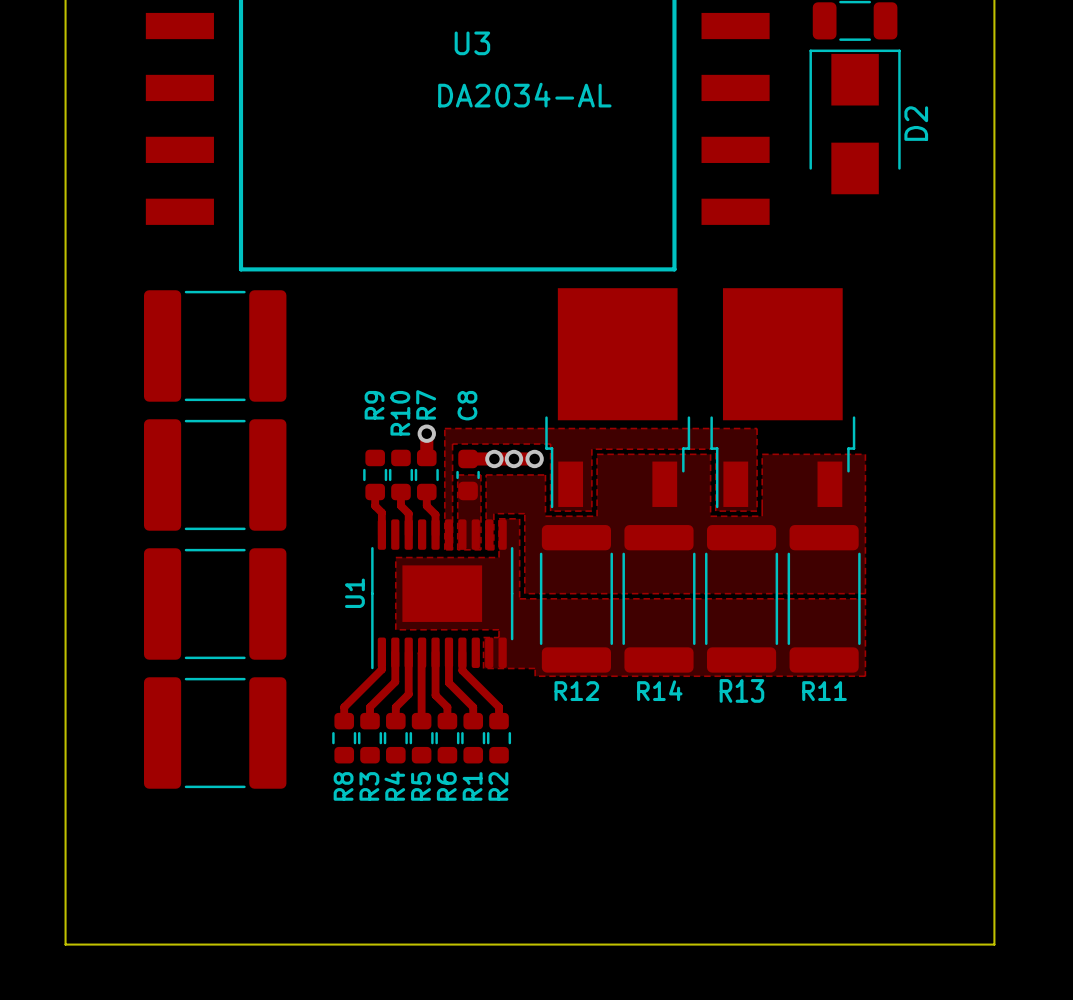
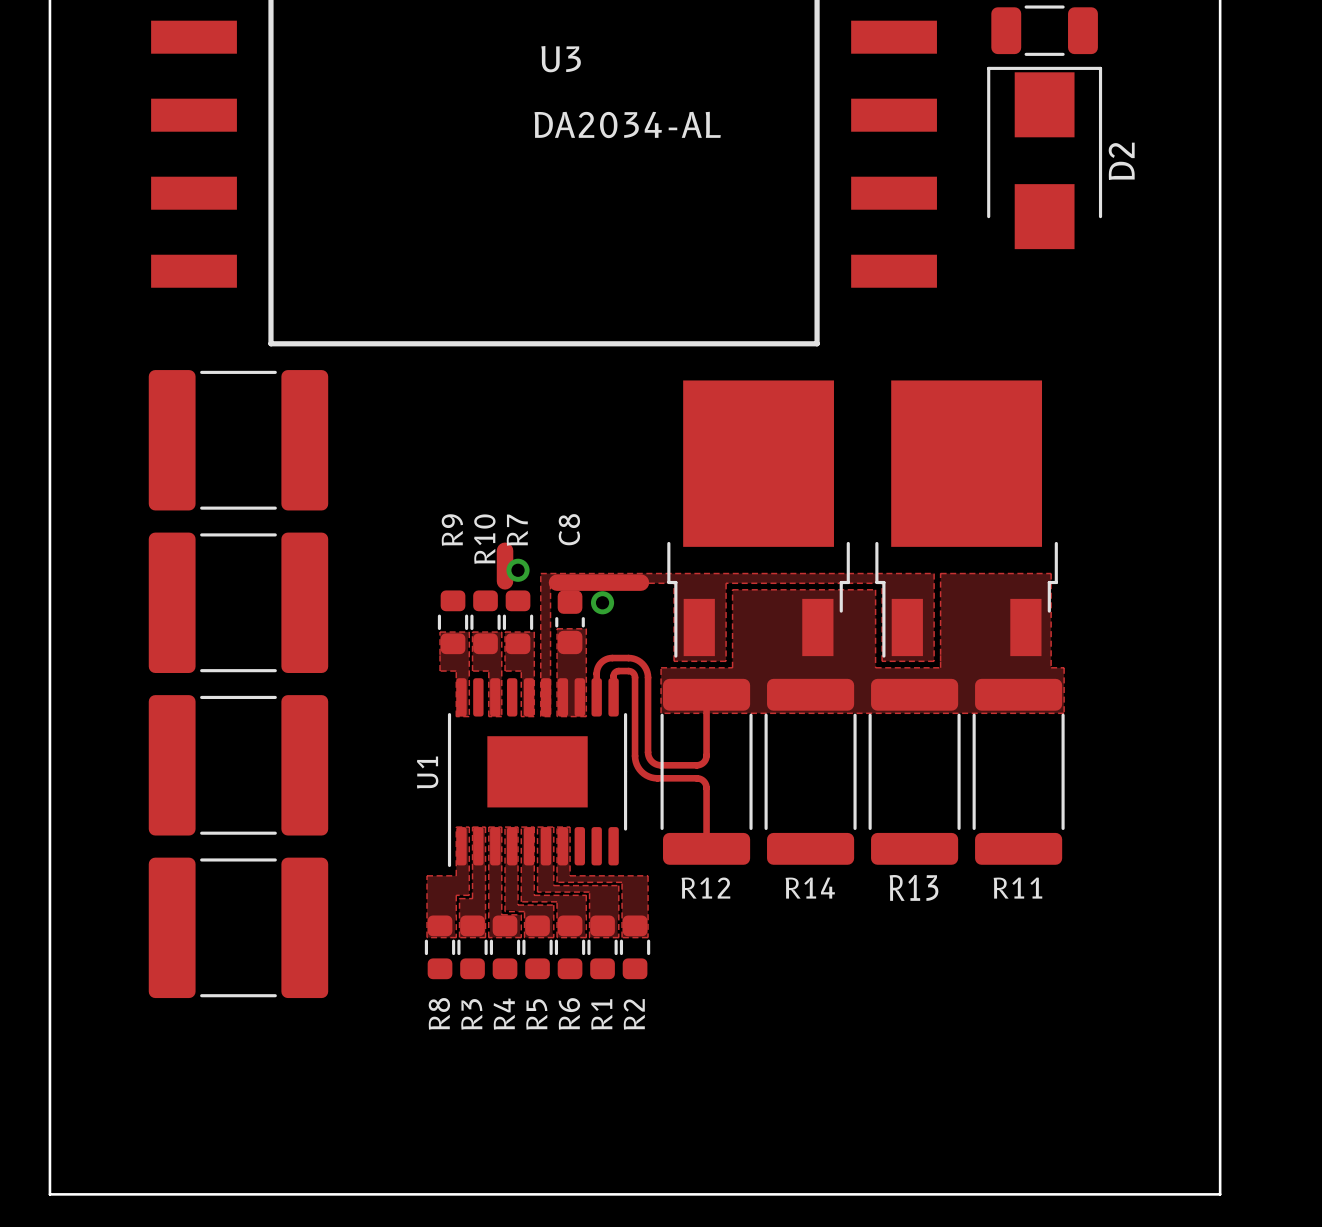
part position: (617, 398) -> (758, 519)
part position: (782, 398) -> (966, 519)
zone outline: (444, 428) (444, 549) (452, 549) (452, 444) (550, 444) (550, 511) (591, 511) (591, 449) (715, 449) (715, 511) (757, 511) (757, 428) (444, 428) -> (540, 573) (540, 716) (550, 716) (550, 583) (674, 583) (674, 661) (726, 661) (726, 583) (882, 583) (882, 661) (934, 661) (934, 573) (540, 573)
via position: (426, 433) -> (518, 570)
zone outline: (597, 454) (710, 454) (710, 516) (762, 516) (762, 454) (865, 454) (865, 593) (524, 593) (524, 513) (493, 513) (493, 549) (486, 549) (486, 474) (545, 474) (545, 516) (597, 516) (597, 454) -> (940, 573) (940, 667) (875, 667) (875, 589) (732, 589) (732, 667) (661, 667) (661, 713) (1064, 713) (1064, 667) (1051, 667) (1051, 573) (940, 573)
via: (494, 458) -> none
via: (513, 458) -> none
via: (534, 458) -> none
R9 position: (375, 474) -> (453, 622)
R10 position: (400, 474) -> (485, 622)
R7 position: (426, 474) -> (518, 622)
zone outline: (457, 474) (457, 549) (480, 549) (480, 474) (457, 474) -> none
C8 position: (468, 474) -> (570, 622)
via: none -> (602, 602)
track: (375, 492) (375, 505) (381, 512) (381, 534) -> none
track: (400, 492) (400, 505) (408, 513) (408, 534) -> none
track: (426, 492) (426, 505) (435, 514) (435, 534) -> none
zone outline: none -> (557, 628) (557, 716) (586, 716) (586, 628) (557, 628)
zone outline: none -> (440, 632) (469, 632) (469, 716) (456, 716) (456, 671) (440, 671) (440, 632)
zone outline: none -> (472, 632) (472, 671) (488, 671) (488, 716) (501, 716) (501, 632) (472, 632)
zone outline: none -> (505, 632) (505, 671) (521, 671) (521, 716) (534, 716) (534, 632) (505, 632)
zone outline: (499, 518) (499, 557) (395, 557) (395, 629) (499, 629) (499, 637) (483, 637) (483, 668) (535, 668) (535, 676) (865, 676) (865, 598) (519, 598) (519, 518) (499, 518) -> none
track: none -> (706, 694) (706, 756) (702, 763) (696, 765) (659, 765) (649, 758) (648, 752) (647, 675) (640, 662) (628, 658) (610, 658) (602, 661) (596, 671) (596, 697)
track: none -> (613, 697) (614, 673) (618, 671) (632, 672) (635, 677) (635, 758) (641, 771) (654, 778) (698, 778) (705, 783) (706, 848)
U1 position: (442, 594) -> (537, 772)
R12 position: (576, 598) -> (706, 771)
R14 position: (658, 598) -> (810, 771)
R13 position: (741, 598) -> (914, 771)
R11 position: (824, 598) -> (1018, 771)
track: (381, 652) (381, 669) (344, 707) (344, 721) -> none
track: (395, 652) (395, 681) (370, 707) (370, 721) -> none
track: (408, 652) (408, 694) (395, 707) (395, 721) -> none
track: (422, 652) (421, 721) -> none
track: (435, 652) (435, 695) (447, 707) (447, 721) -> none
track: (448, 652) (448, 682) (473, 707) (473, 721) -> none
track: (462, 652) (462, 670) (499, 707) (499, 721) -> none
zone outline: none -> (456, 827) (469, 827) (469, 895) (456, 895) (456, 937) (427, 937) (427, 875) (456, 875) (456, 827)
zone outline: none -> (472, 827) (472, 898) (459, 898) (459, 937) (485, 937) (485, 827) (472, 827)
zone outline: none -> (488, 827) (501, 827) (501, 914) (521, 914) (521, 937) (488, 937) (488, 827)
zone outline: none -> (505, 827) (518, 827) (518, 905) (553, 905) (553, 937) (524, 937) (524, 911) (505, 911) (505, 827)
zone outline: none -> (521, 827) (534, 827) (534, 895) (586, 895) (586, 937) (557, 937) (557, 901) (521, 901) (521, 827)
zone outline: none -> (537, 827) (553, 827) (553, 885) (618, 885) (618, 937) (589, 937) (589, 892) (537, 892) (537, 827)
zone outline: none -> (557, 827) (570, 827) (570, 875) (648, 875) (648, 937) (622, 937) (622, 882) (557, 882) (557, 827)
R8 position: (344, 738) -> (440, 947)
R3 position: (370, 738) -> (472, 947)
R4 position: (395, 738) -> (505, 947)
R5 position: (421, 738) -> (537, 947)
R6 position: (447, 738) -> (570, 947)
R1 position: (473, 738) -> (602, 947)
R2 position: (499, 738) -> (635, 947)

